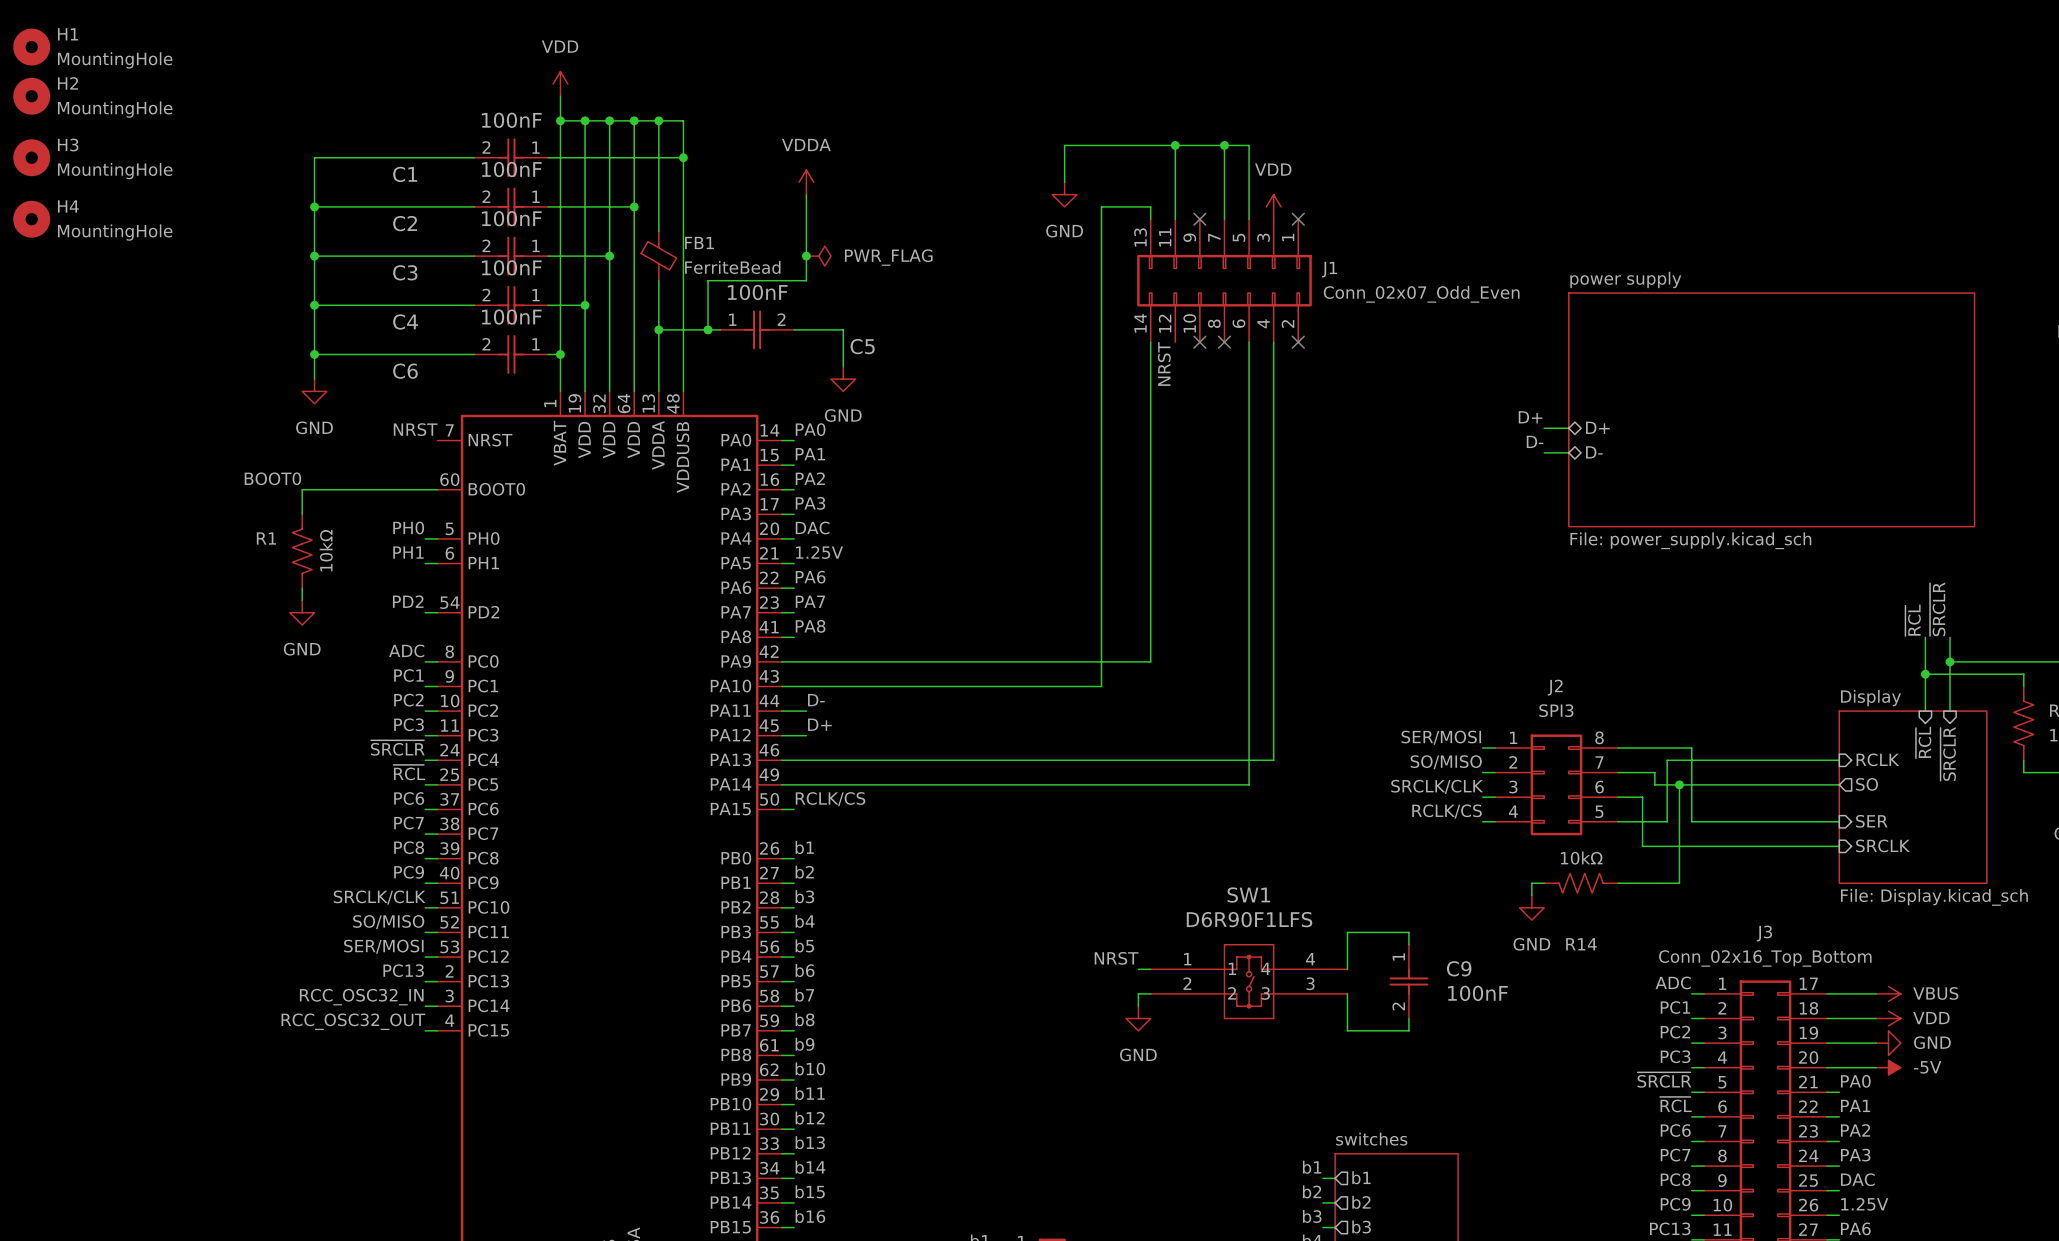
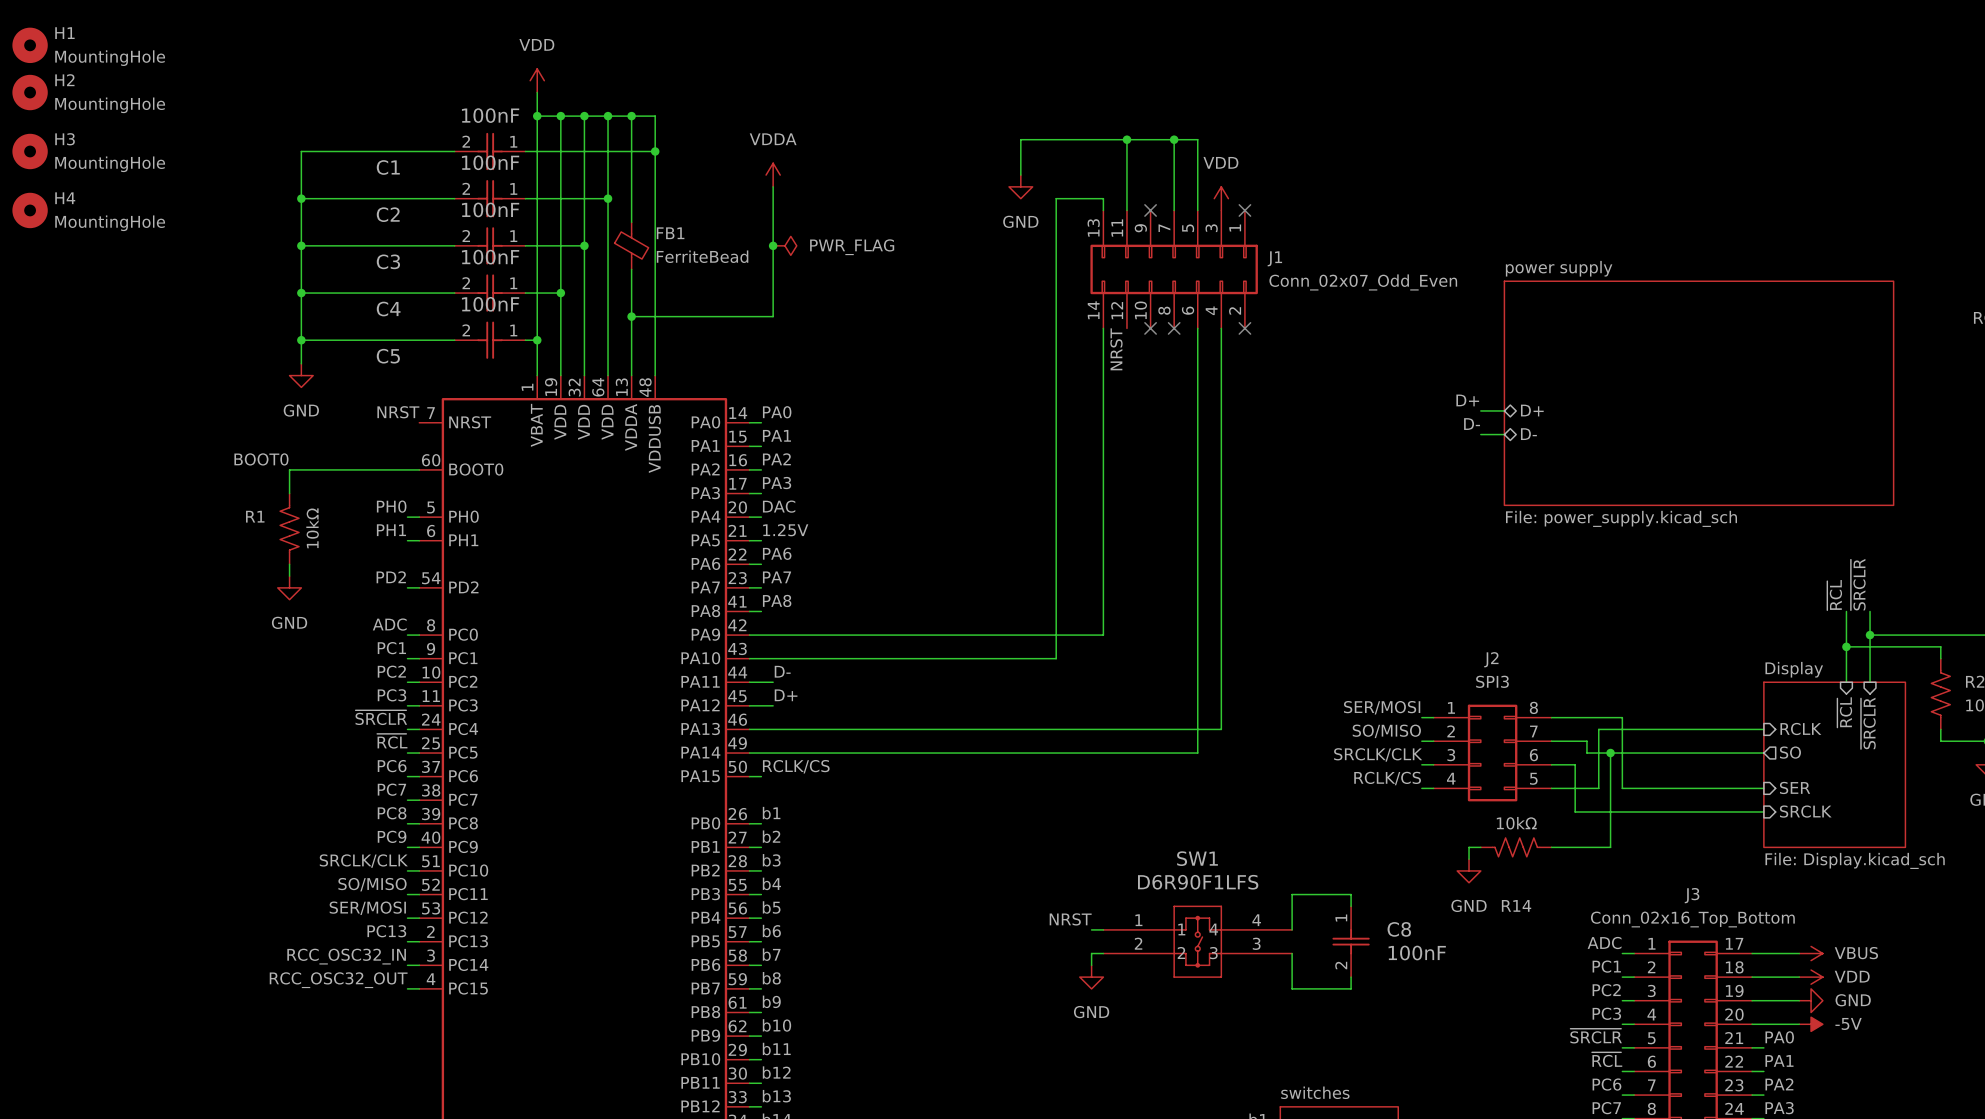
wire: (806, 280) (708, 280) (708, 329) -> none
junction: (708, 329) -> none
C5: 100nF (757, 329) -> none
wire: (806, 329) (843, 329) (843, 366) -> (773, 316) (773, 269)
C6 name: C6 (405, 371) -> C5 (388, 356)
power symbol: GND (843, 379) -> none
C9 name: C9 (1459, 968) -> C8 (1399, 929)

